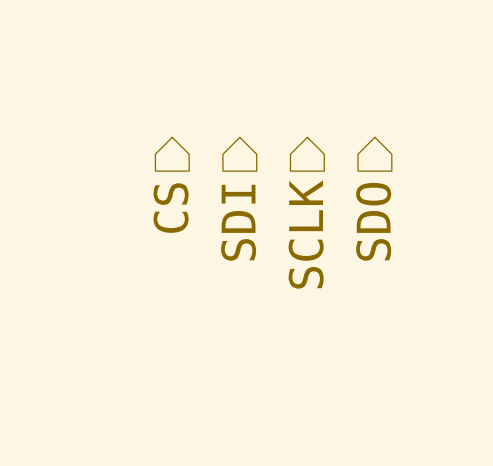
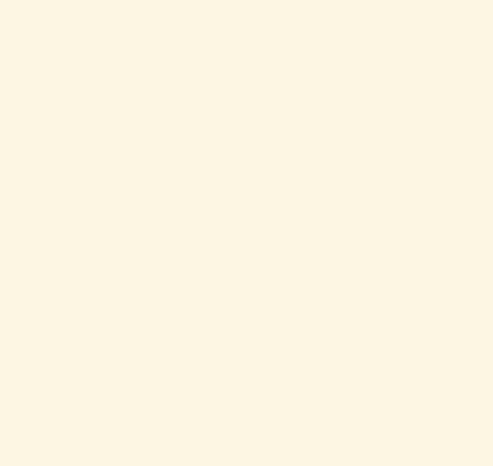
hierarchical label: CS (171, 208) -> none
hierarchical label: SDO (373, 221) -> none
hierarchical label: SDI (238, 222) -> none
hierarchical label: SCLK (306, 234) -> none

